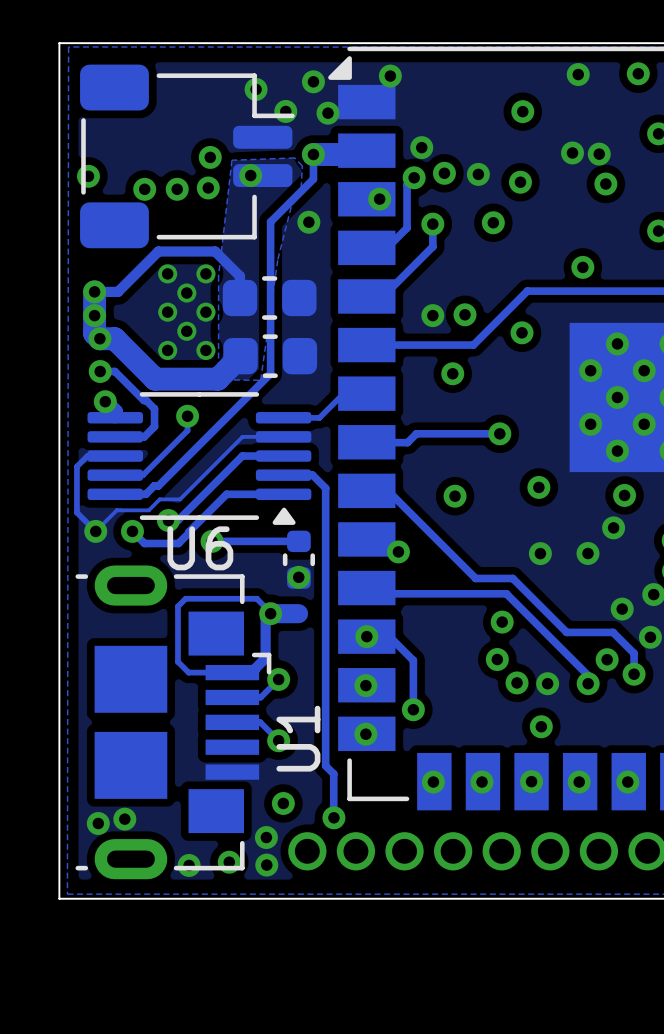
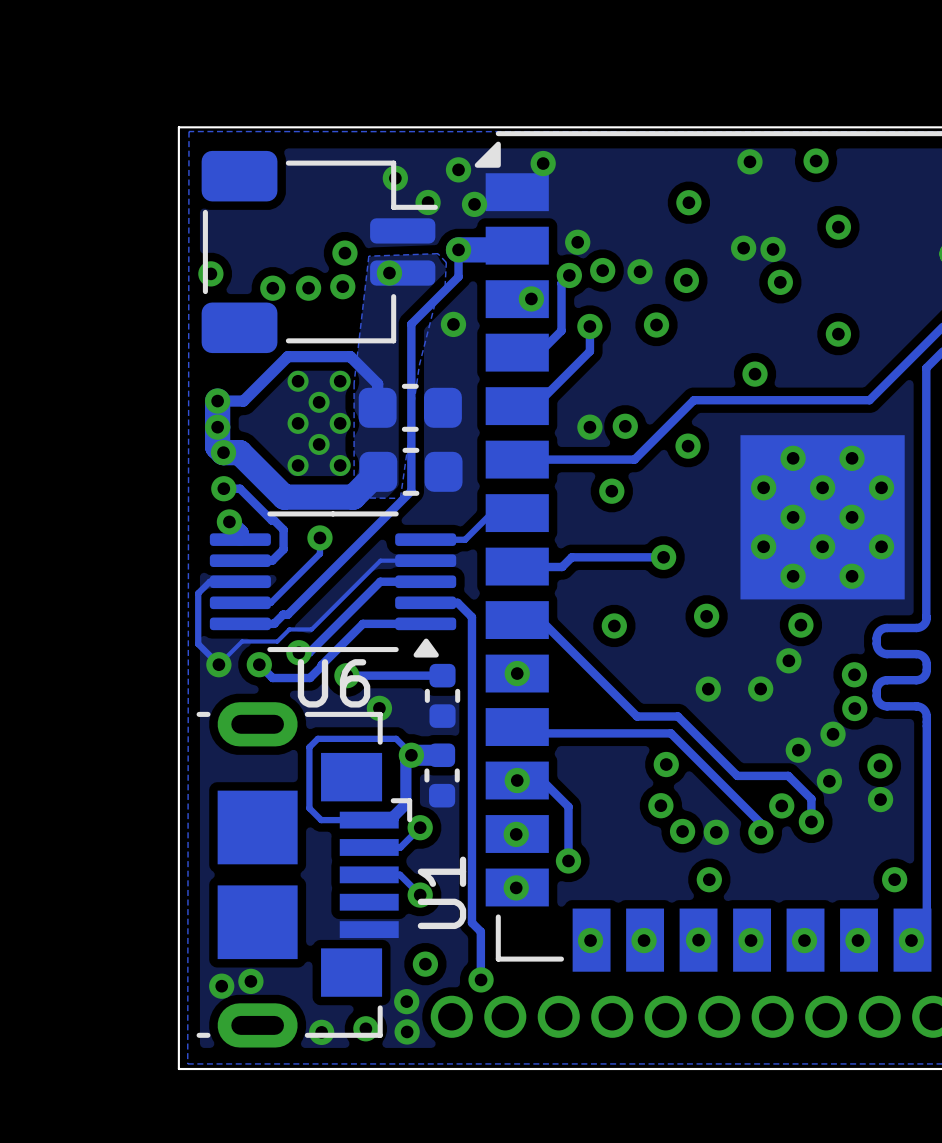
via position: (398, 551) -> (517, 673)
via: none -> (379, 708)
via: (298, 577) -> none
part: none -> (442, 775)

